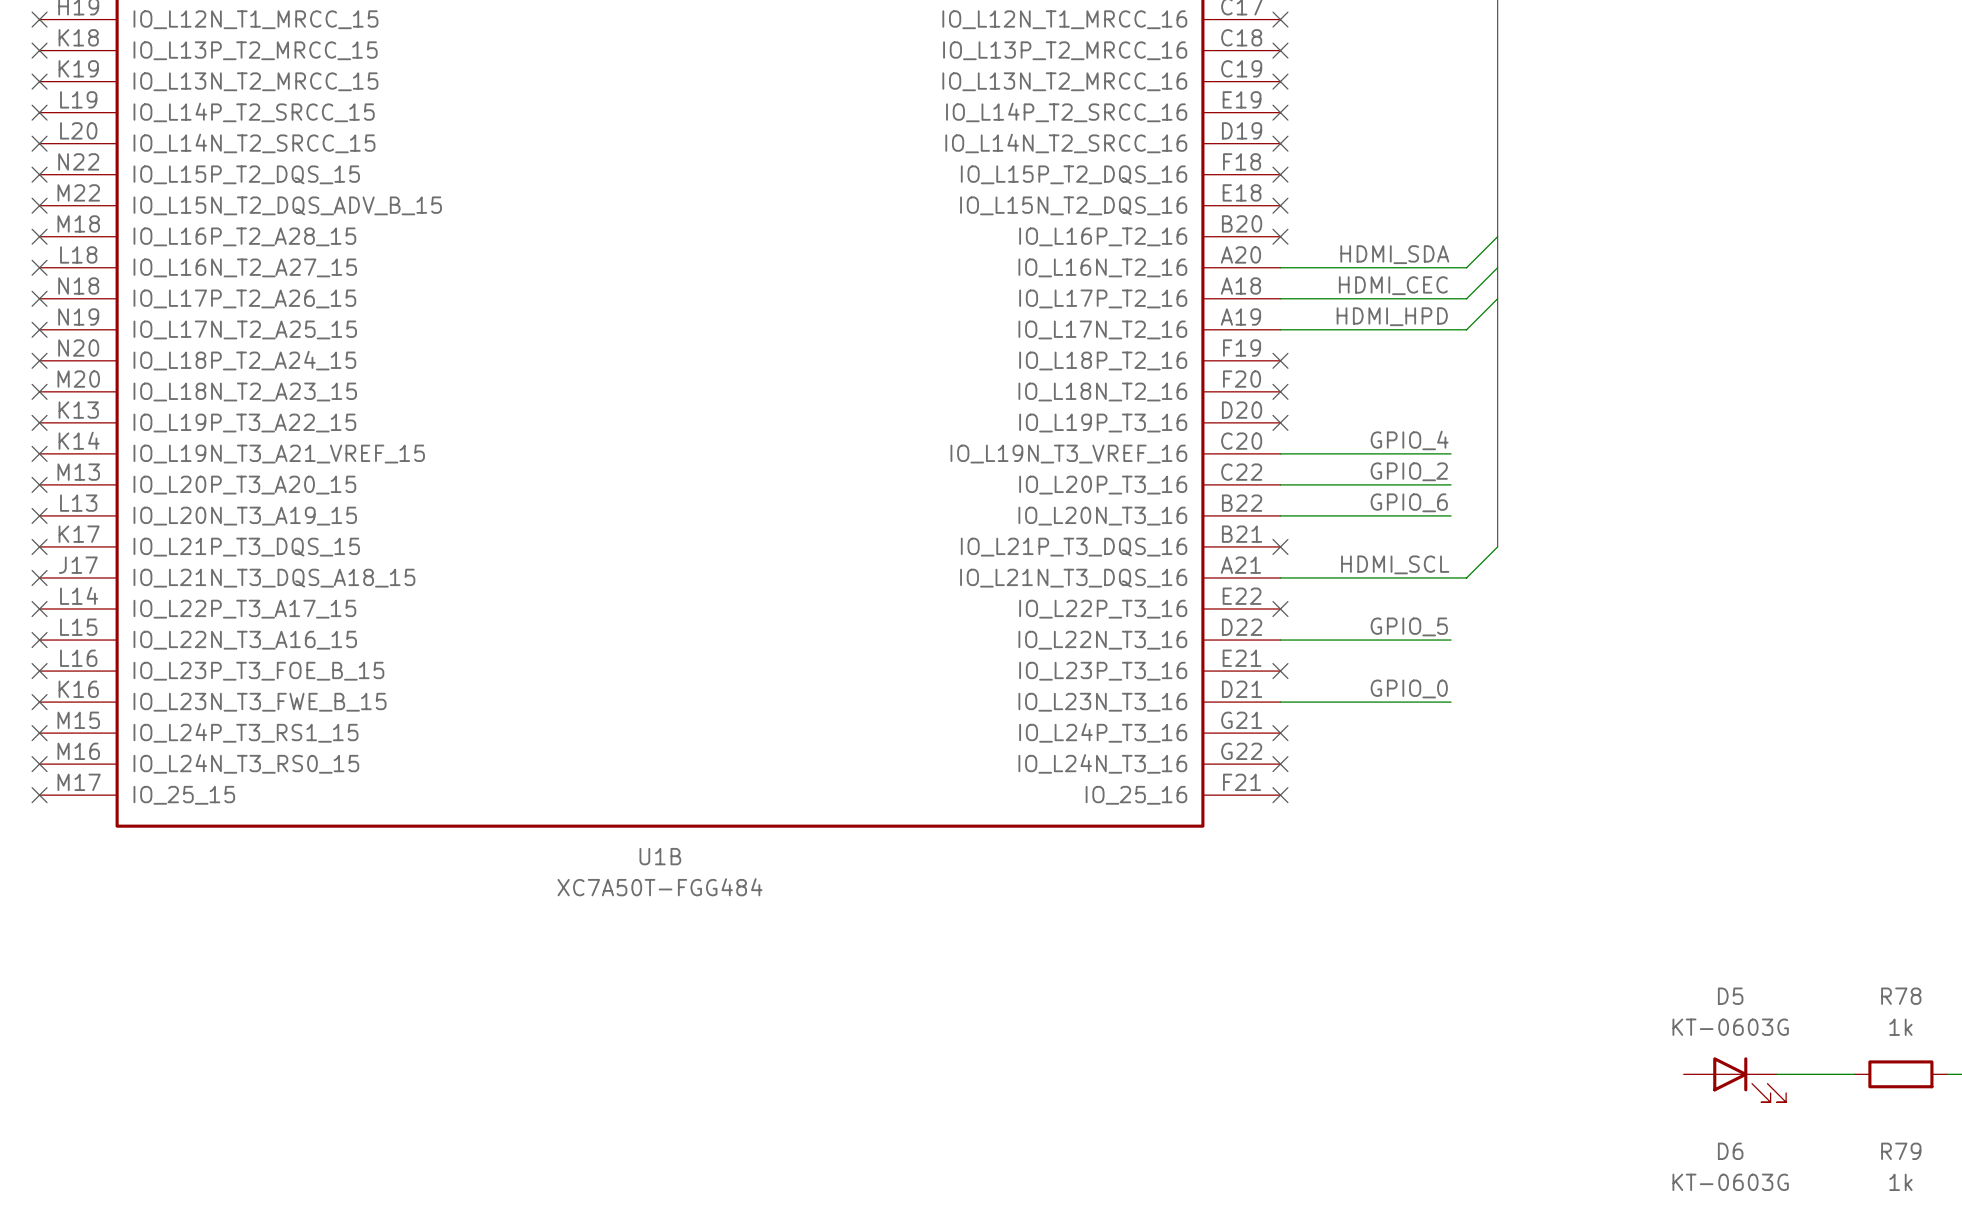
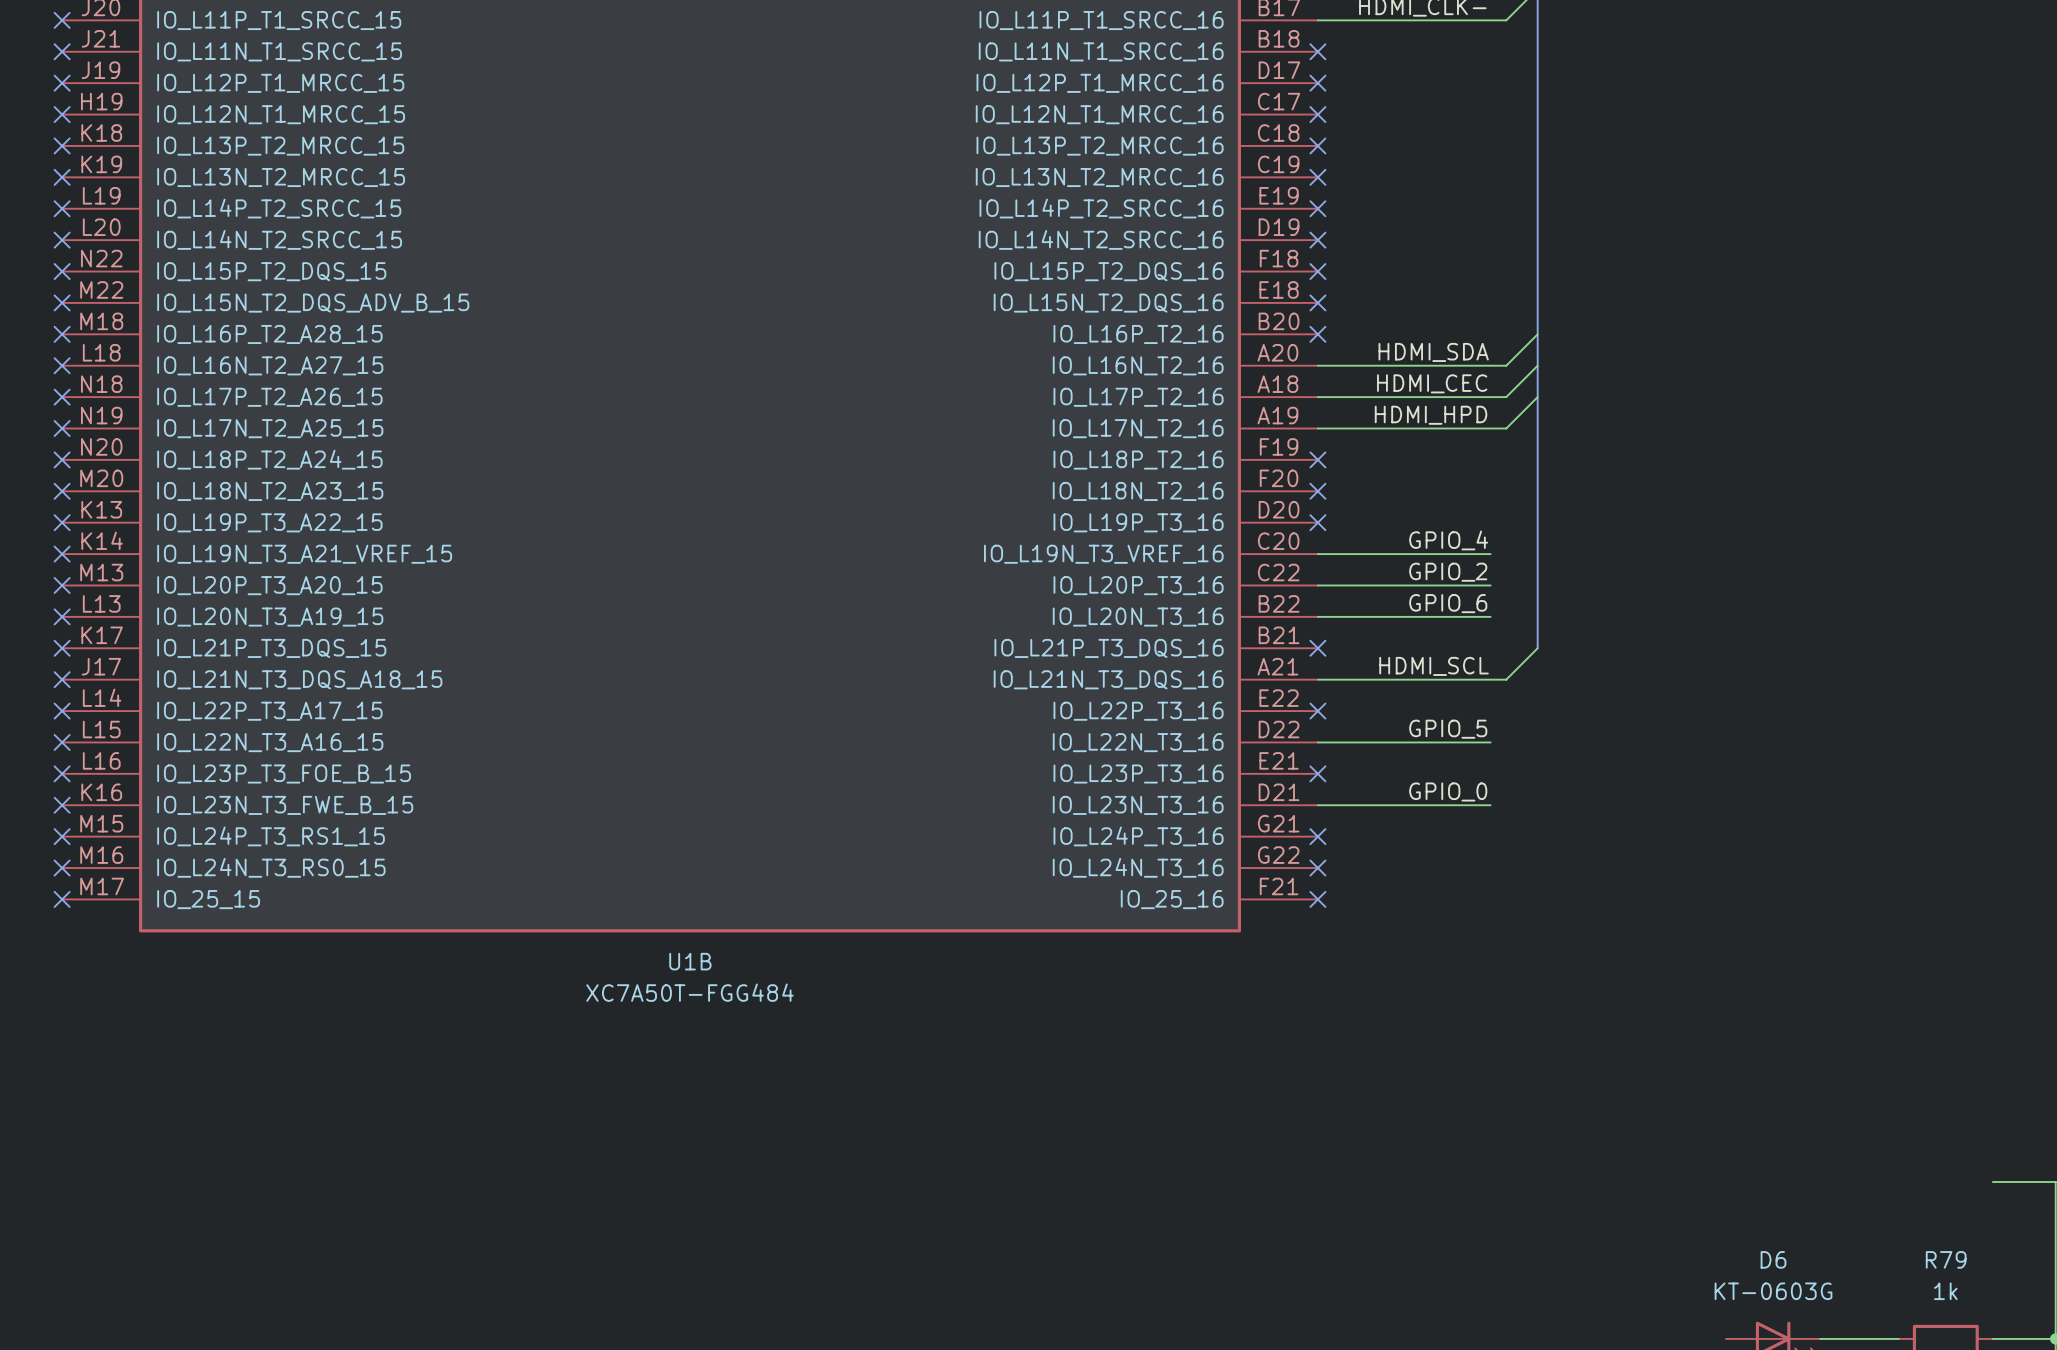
wire: (1776, 1074) (1854, 1074) -> none
R78: 1k (1900, 1074) -> none
D5: KT-0603G (1734, 1079) -> none

